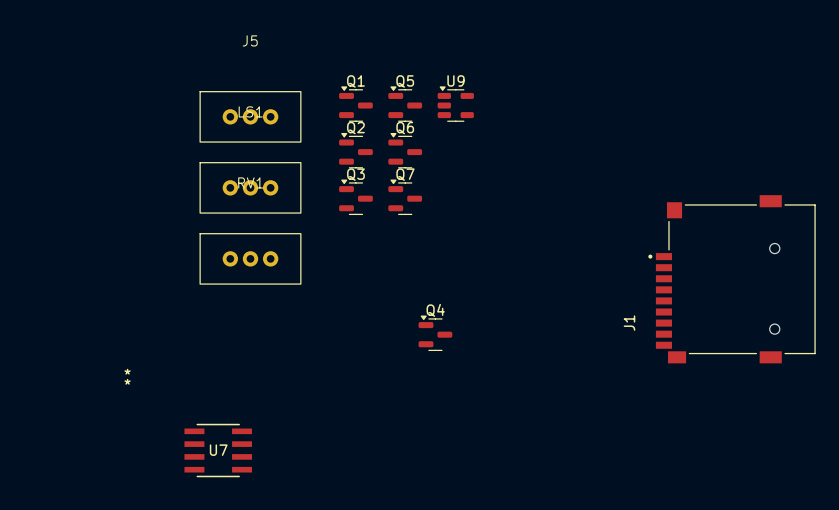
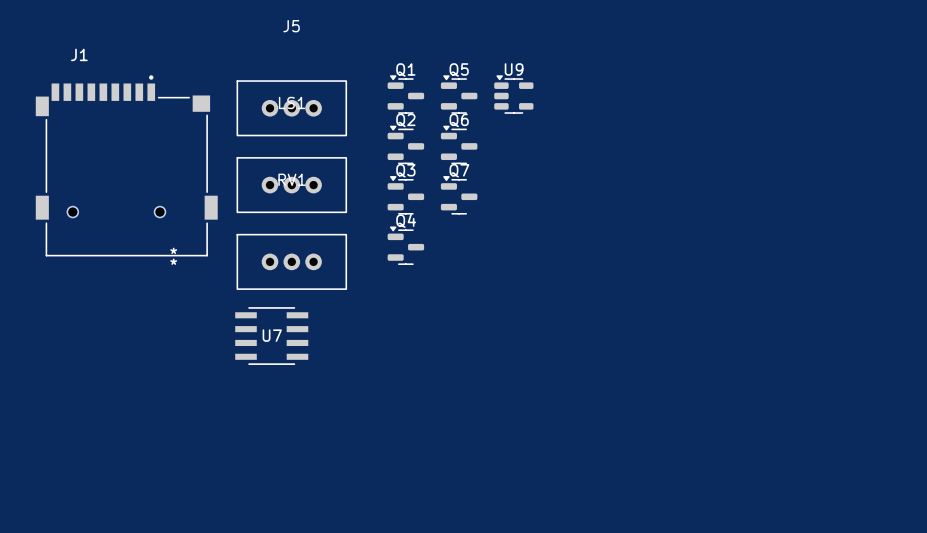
J1 rotation: 0° (732, 279) -> 90° clockwise (126, 165)
J1 position: (732, 279) -> (126, 165)
Q4 position: (435, 333) -> (405, 245)
U7 position: (218, 450) -> (271, 336)

